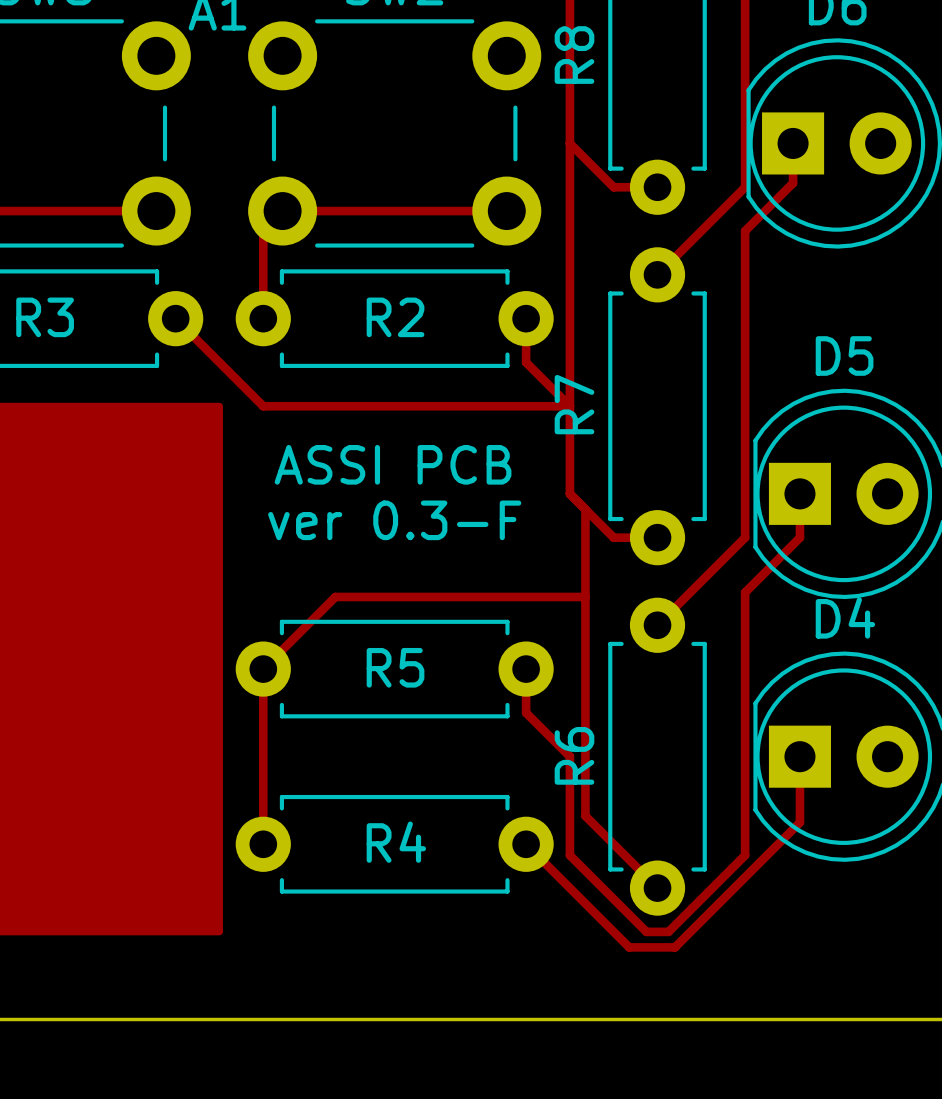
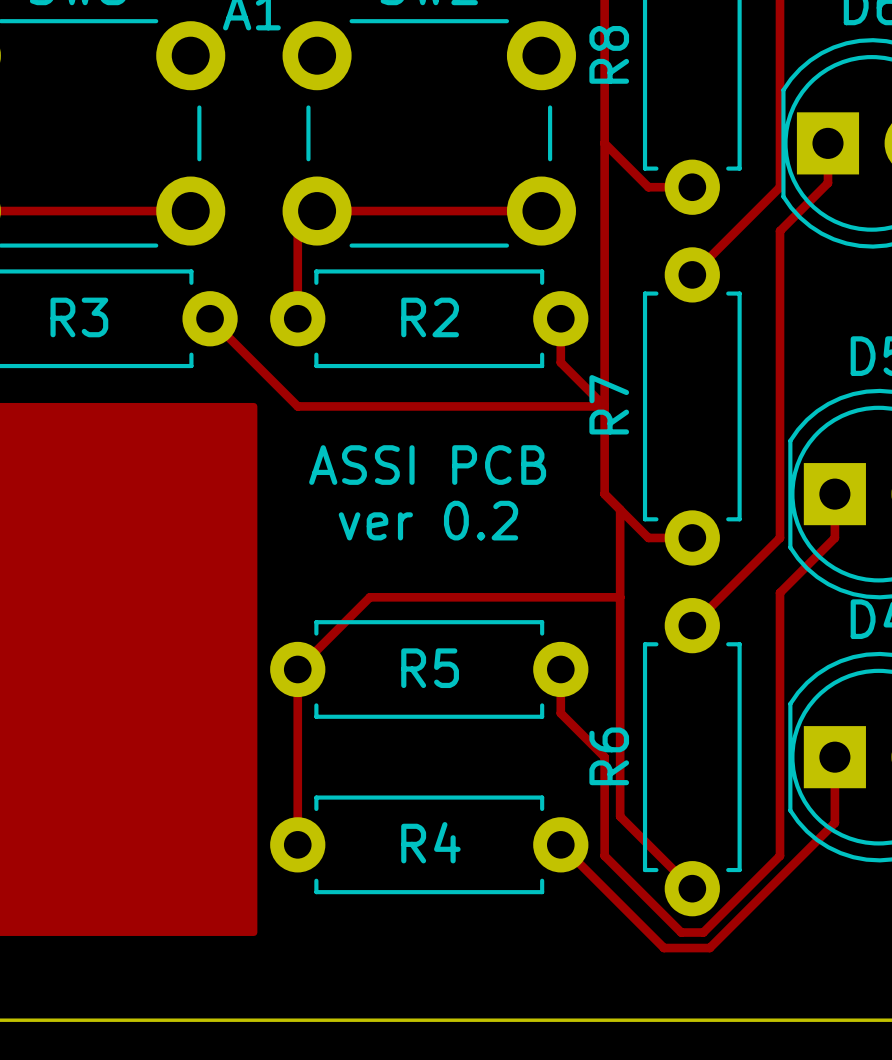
text: ver 0.3-F (394, 520) -> ver 0.2 (428, 520)

